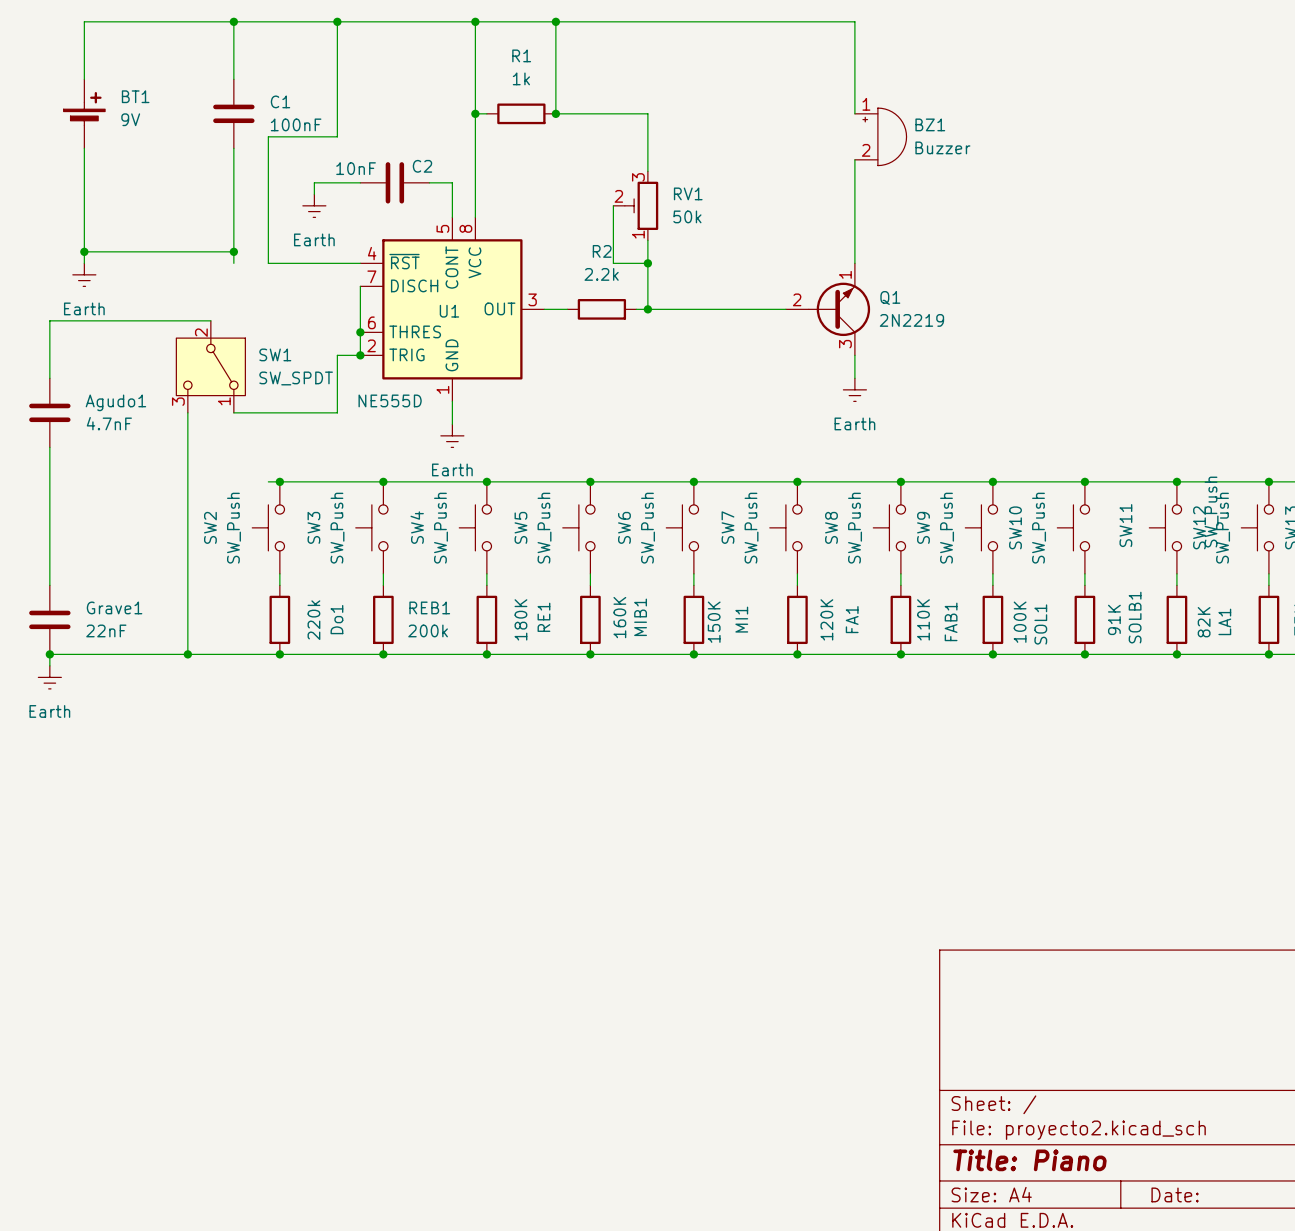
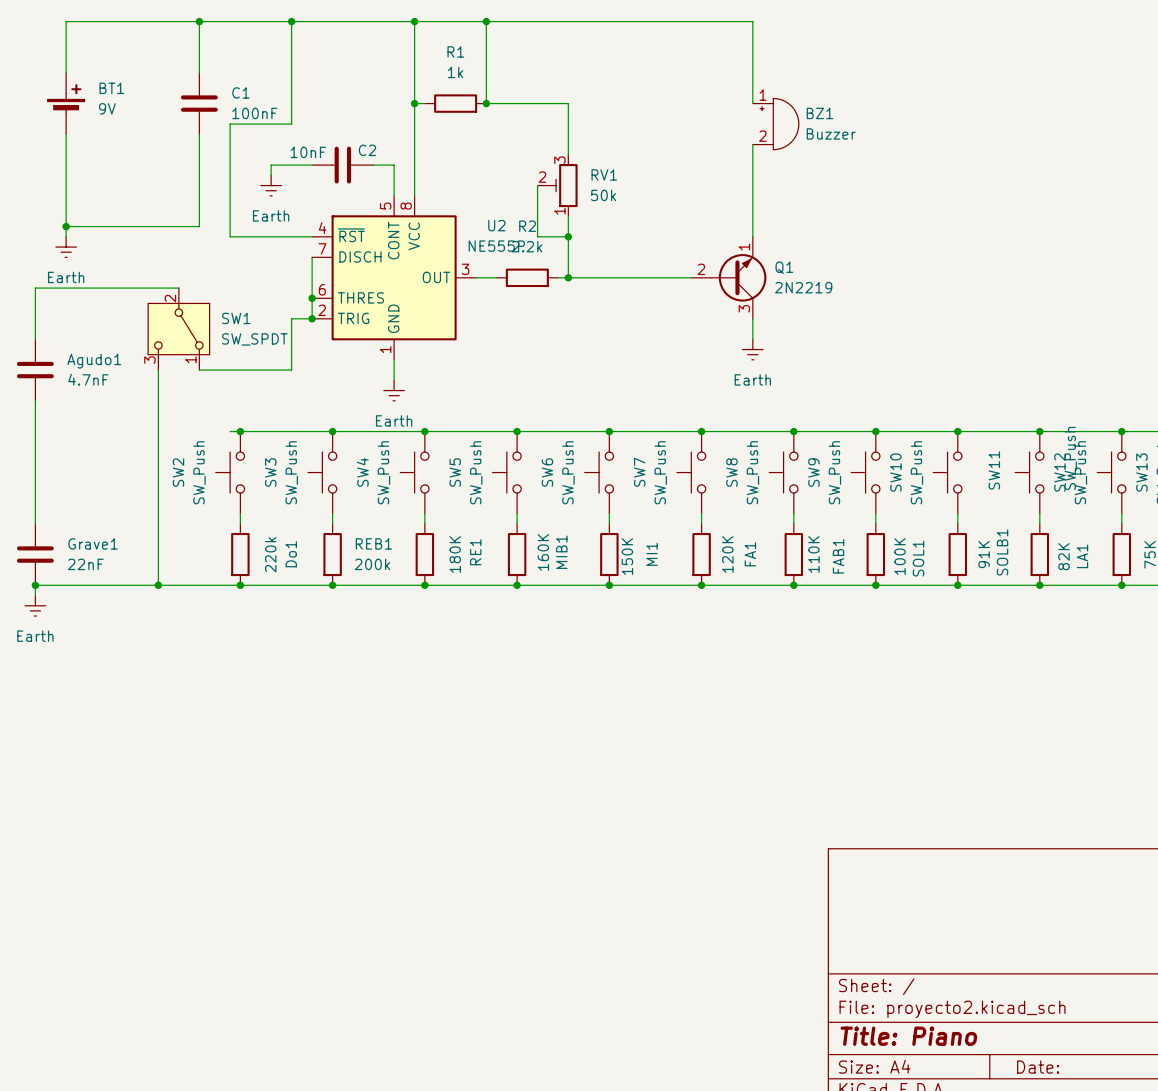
wire: (233, 251) (233, 263) -> none
junction: (233, 251) -> none
U1 name: U1 (449, 311) -> U2 (496, 225)
U1 value: NE555D (390, 400) -> NE555P (496, 246)

